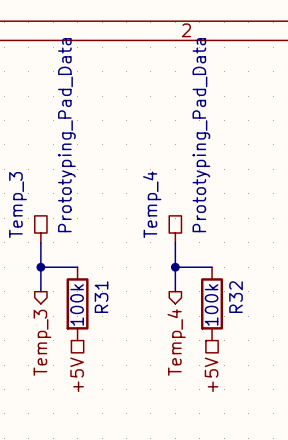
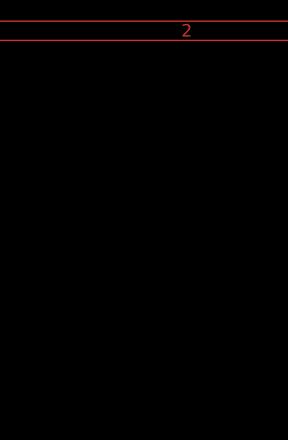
Temp_3: Prototyping_Pad_Data (40, 229) -> none
Temp_4: Prototyping_Pad_Data (175, 229) -> none
wire: (40, 242) (40, 291) -> none
wire: (175, 242) (175, 291) -> none
wire: (40, 267) (77, 267) -> none
junction: (40, 267) -> none
wire: (175, 267) (212, 267) -> none
junction: (175, 267) -> none
R31: 100k (77, 303) -> none
R32: 100k (212, 303) -> none
hierarchical label: Temp_3 (42, 342) -> none
hierarchical label: Temp_4 (176, 342) -> none
hierarchical label: +5V (77, 374) -> none
hierarchical label: +5V (211, 374) -> none

